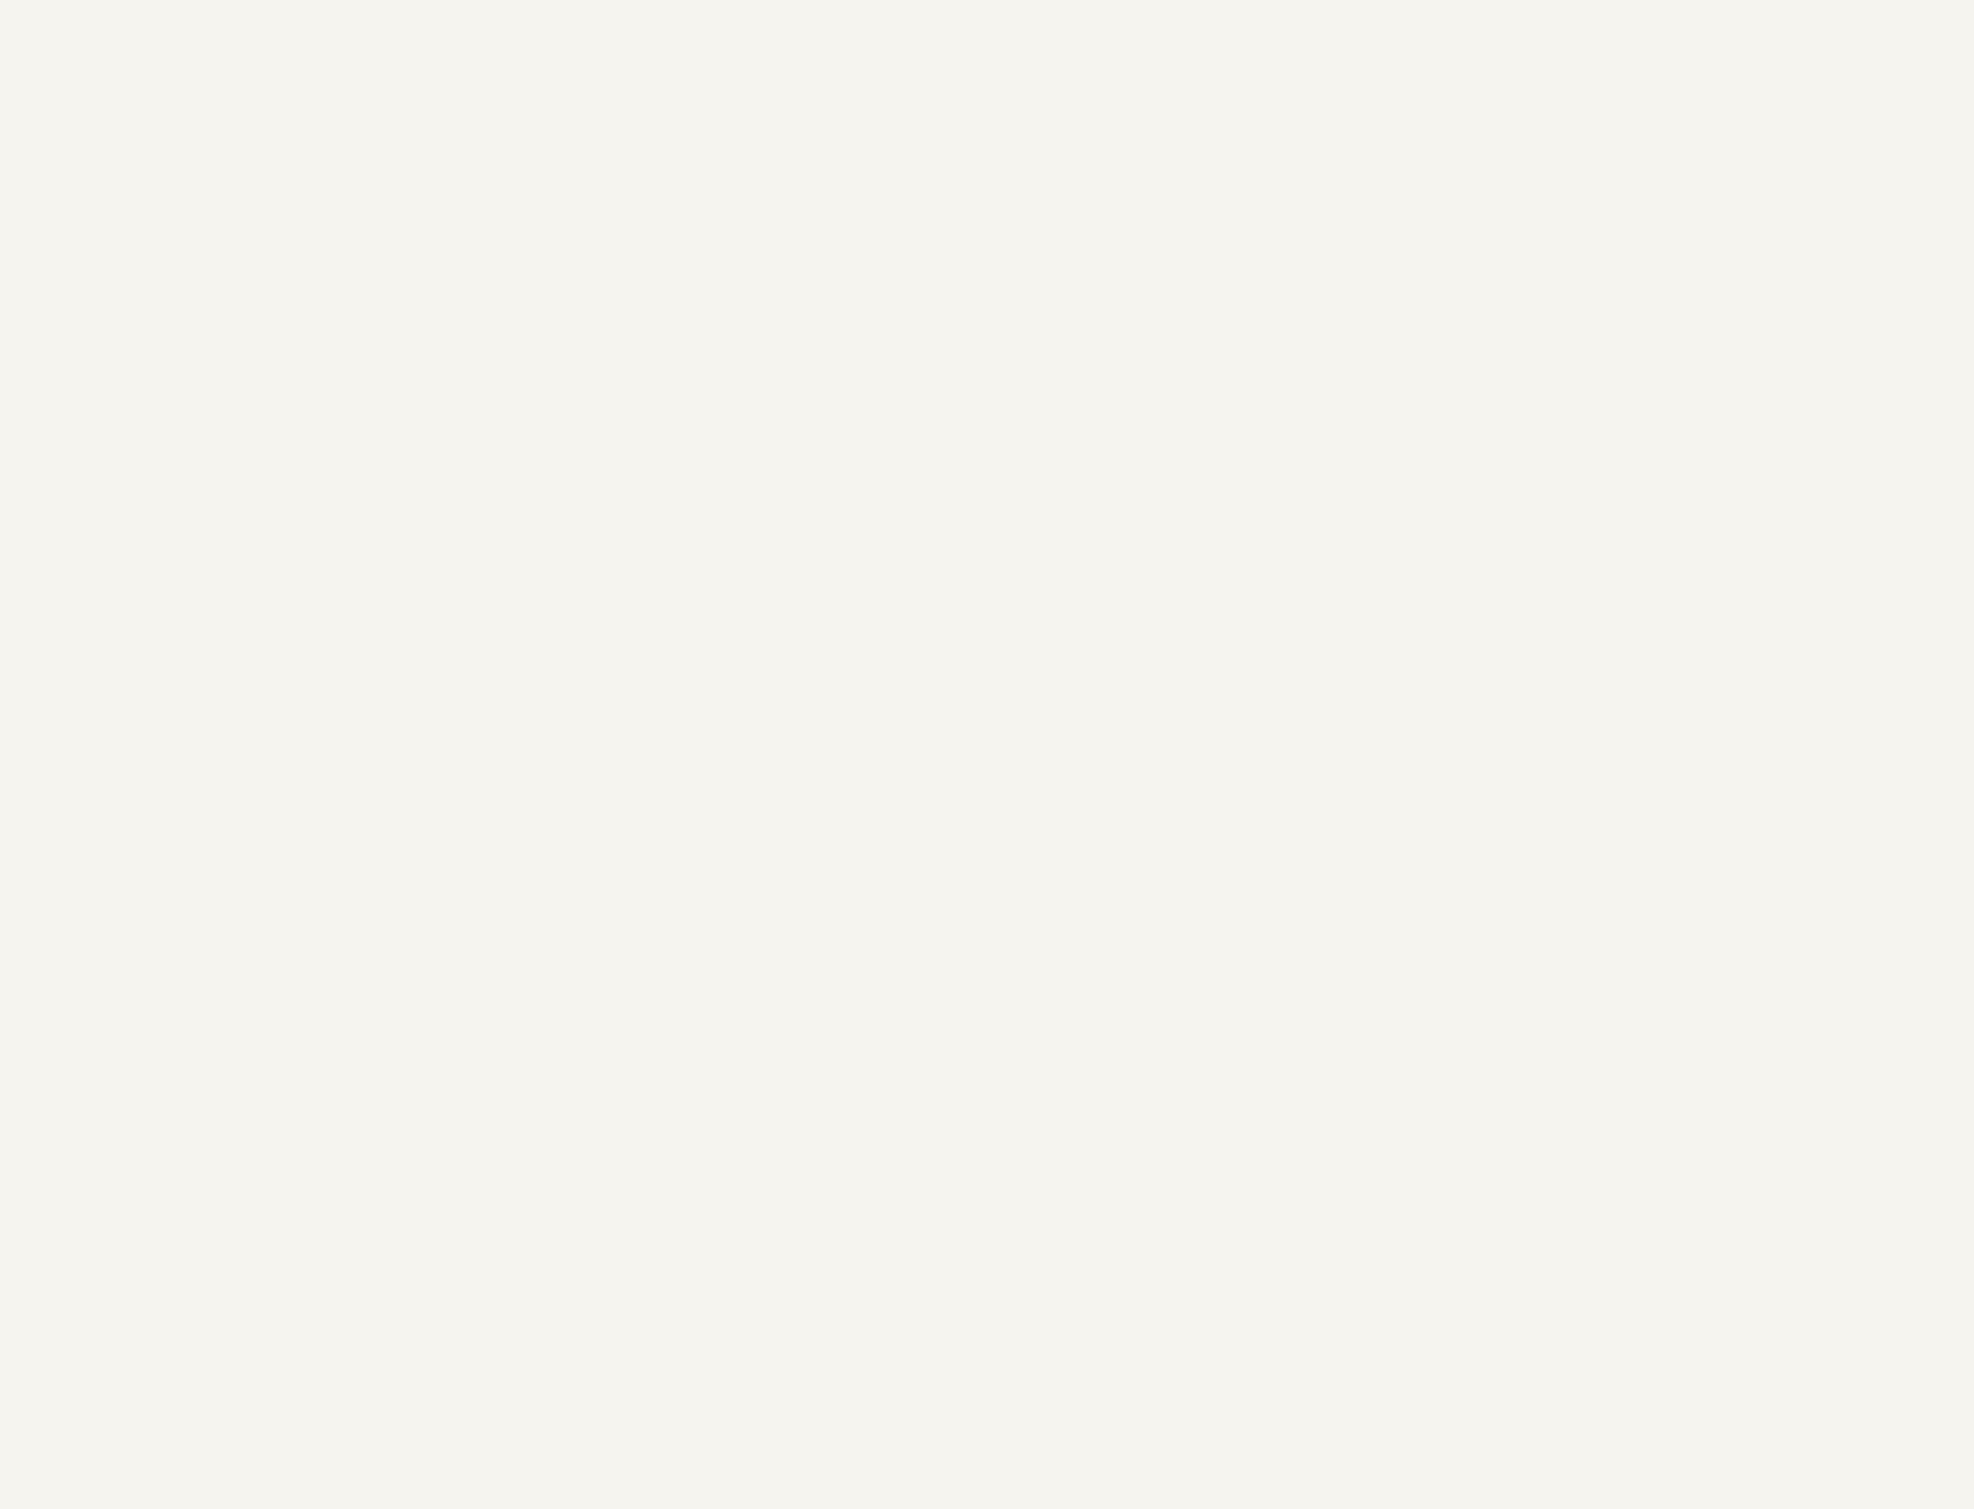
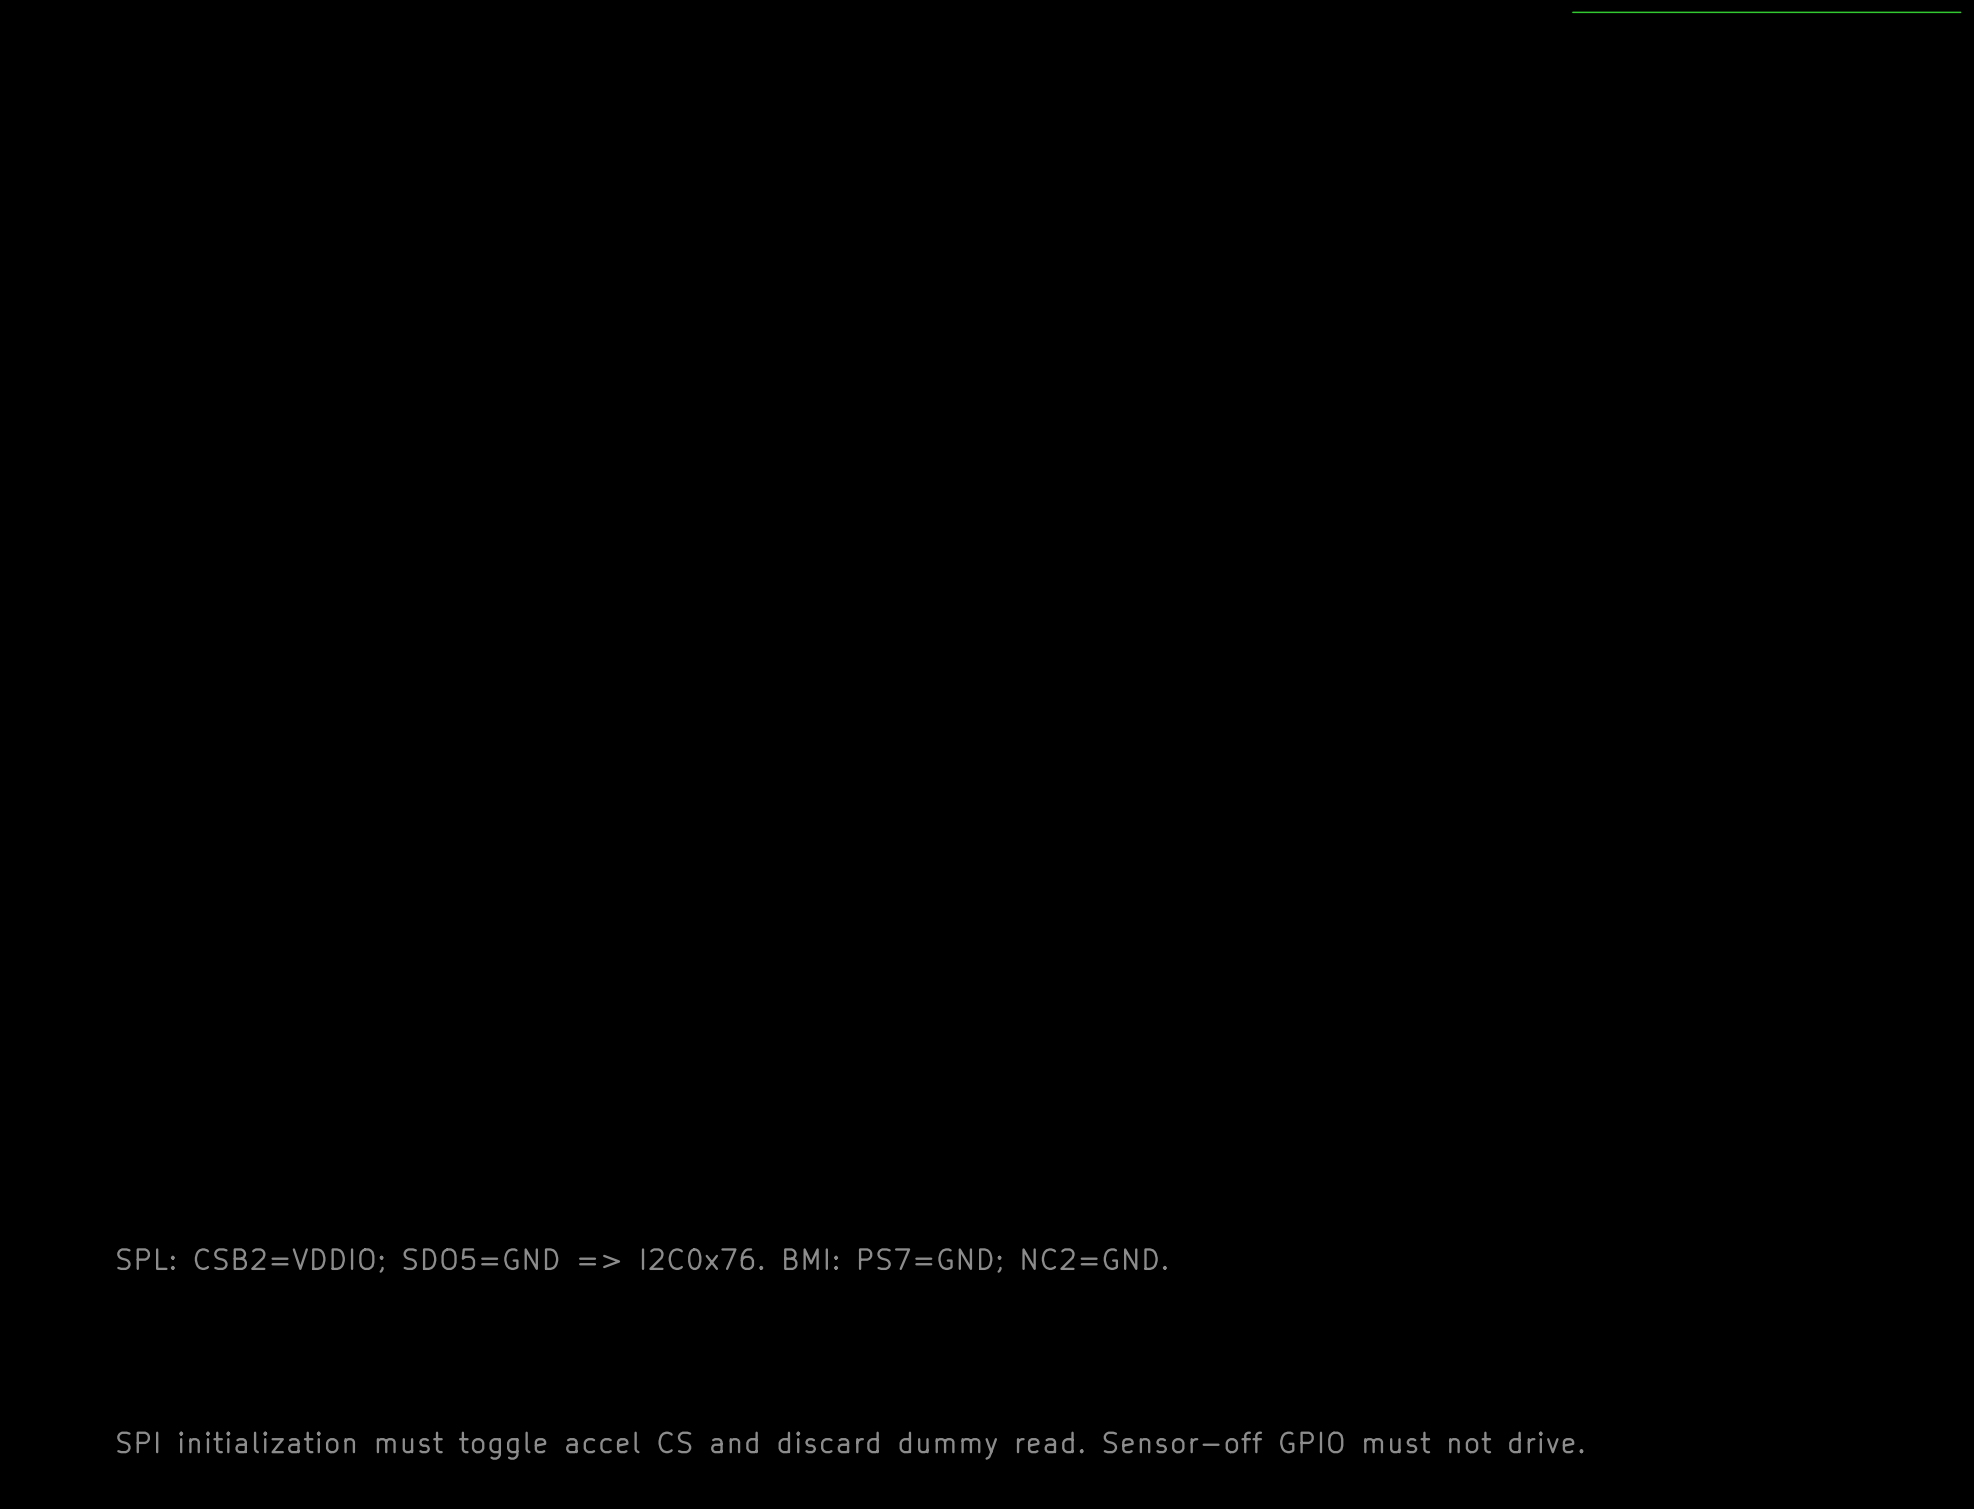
wire: none -> (1572, 12) (1960, 12)
text: none -> SPL: CSB2=VDDIO; SDO5=GND => I2C0x76. BMI: PS7=GND; NC2=GND. (642, 1260)
text: none -> SPI initialization must toggle accel CS and discard dummy read. Sensor-off GPIO must not drive. (850, 1445)

